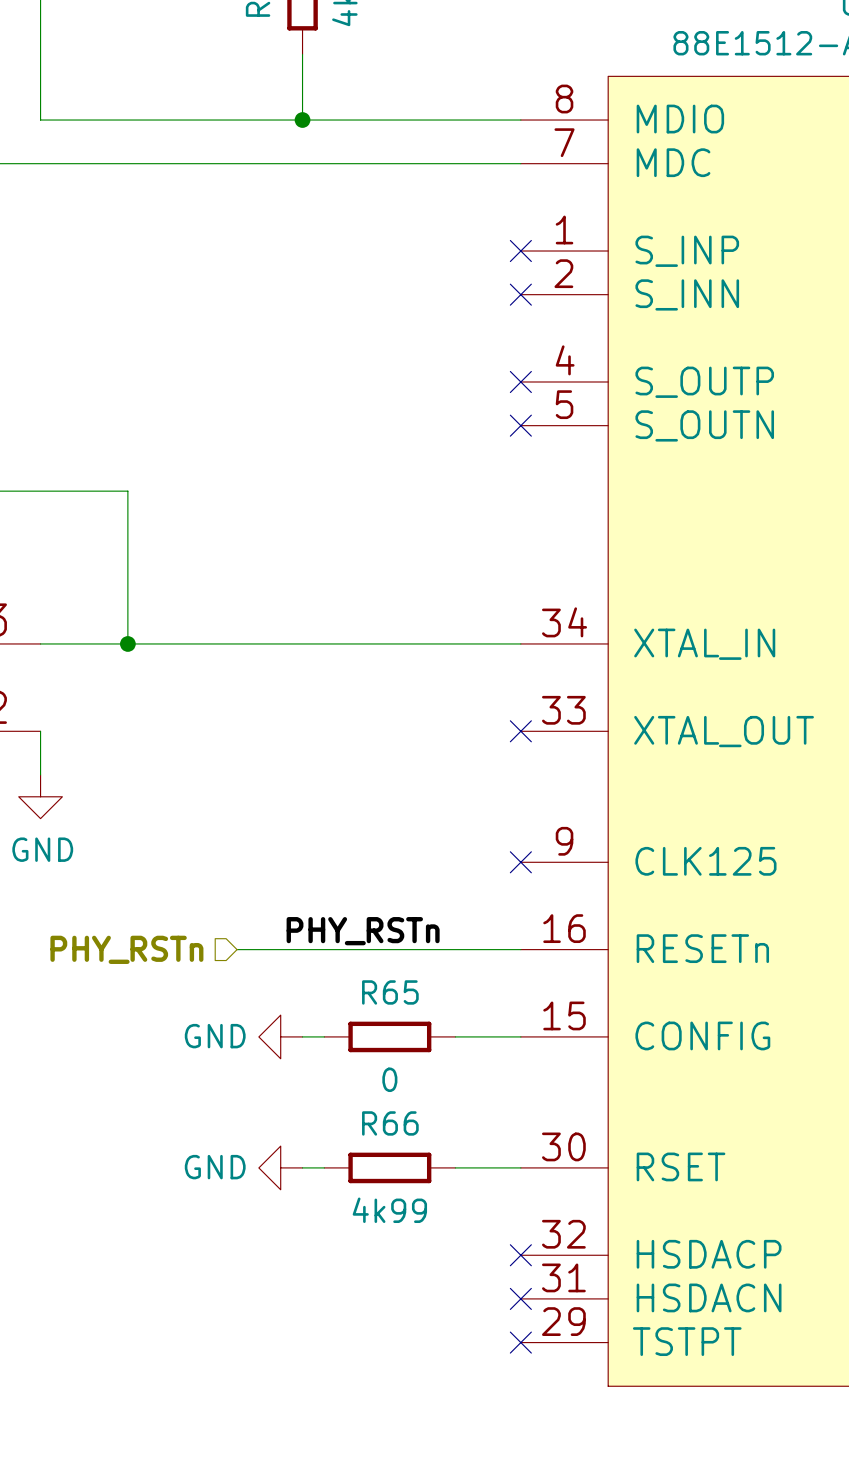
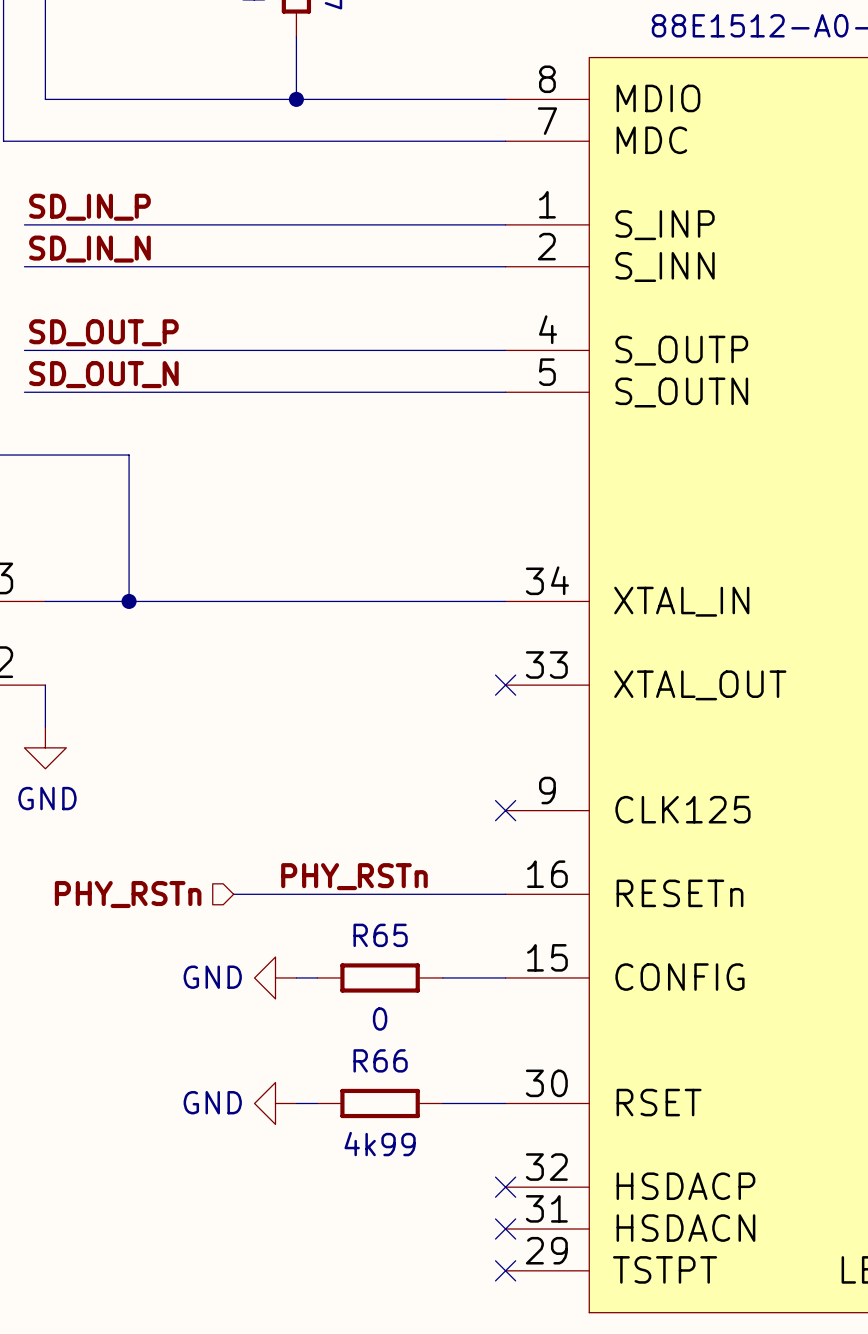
label: none -> SD_IN_P (89, 207)
wire: none -> (24, 224) (505, 224)
no-connect mark: (520, 251) -> none
label: none -> SD_IN_N (89, 249)
wire: none -> (24, 266) (505, 266)
no-connect mark: (520, 294) -> none
label: none -> SD_OUT_P (103, 332)
wire: none -> (24, 350) (505, 350)
no-connect mark: (520, 381) -> none
label: none -> SD_OUT_N (103, 374)
wire: none -> (24, 392) (505, 392)
no-connect mark: (520, 425) -> none

